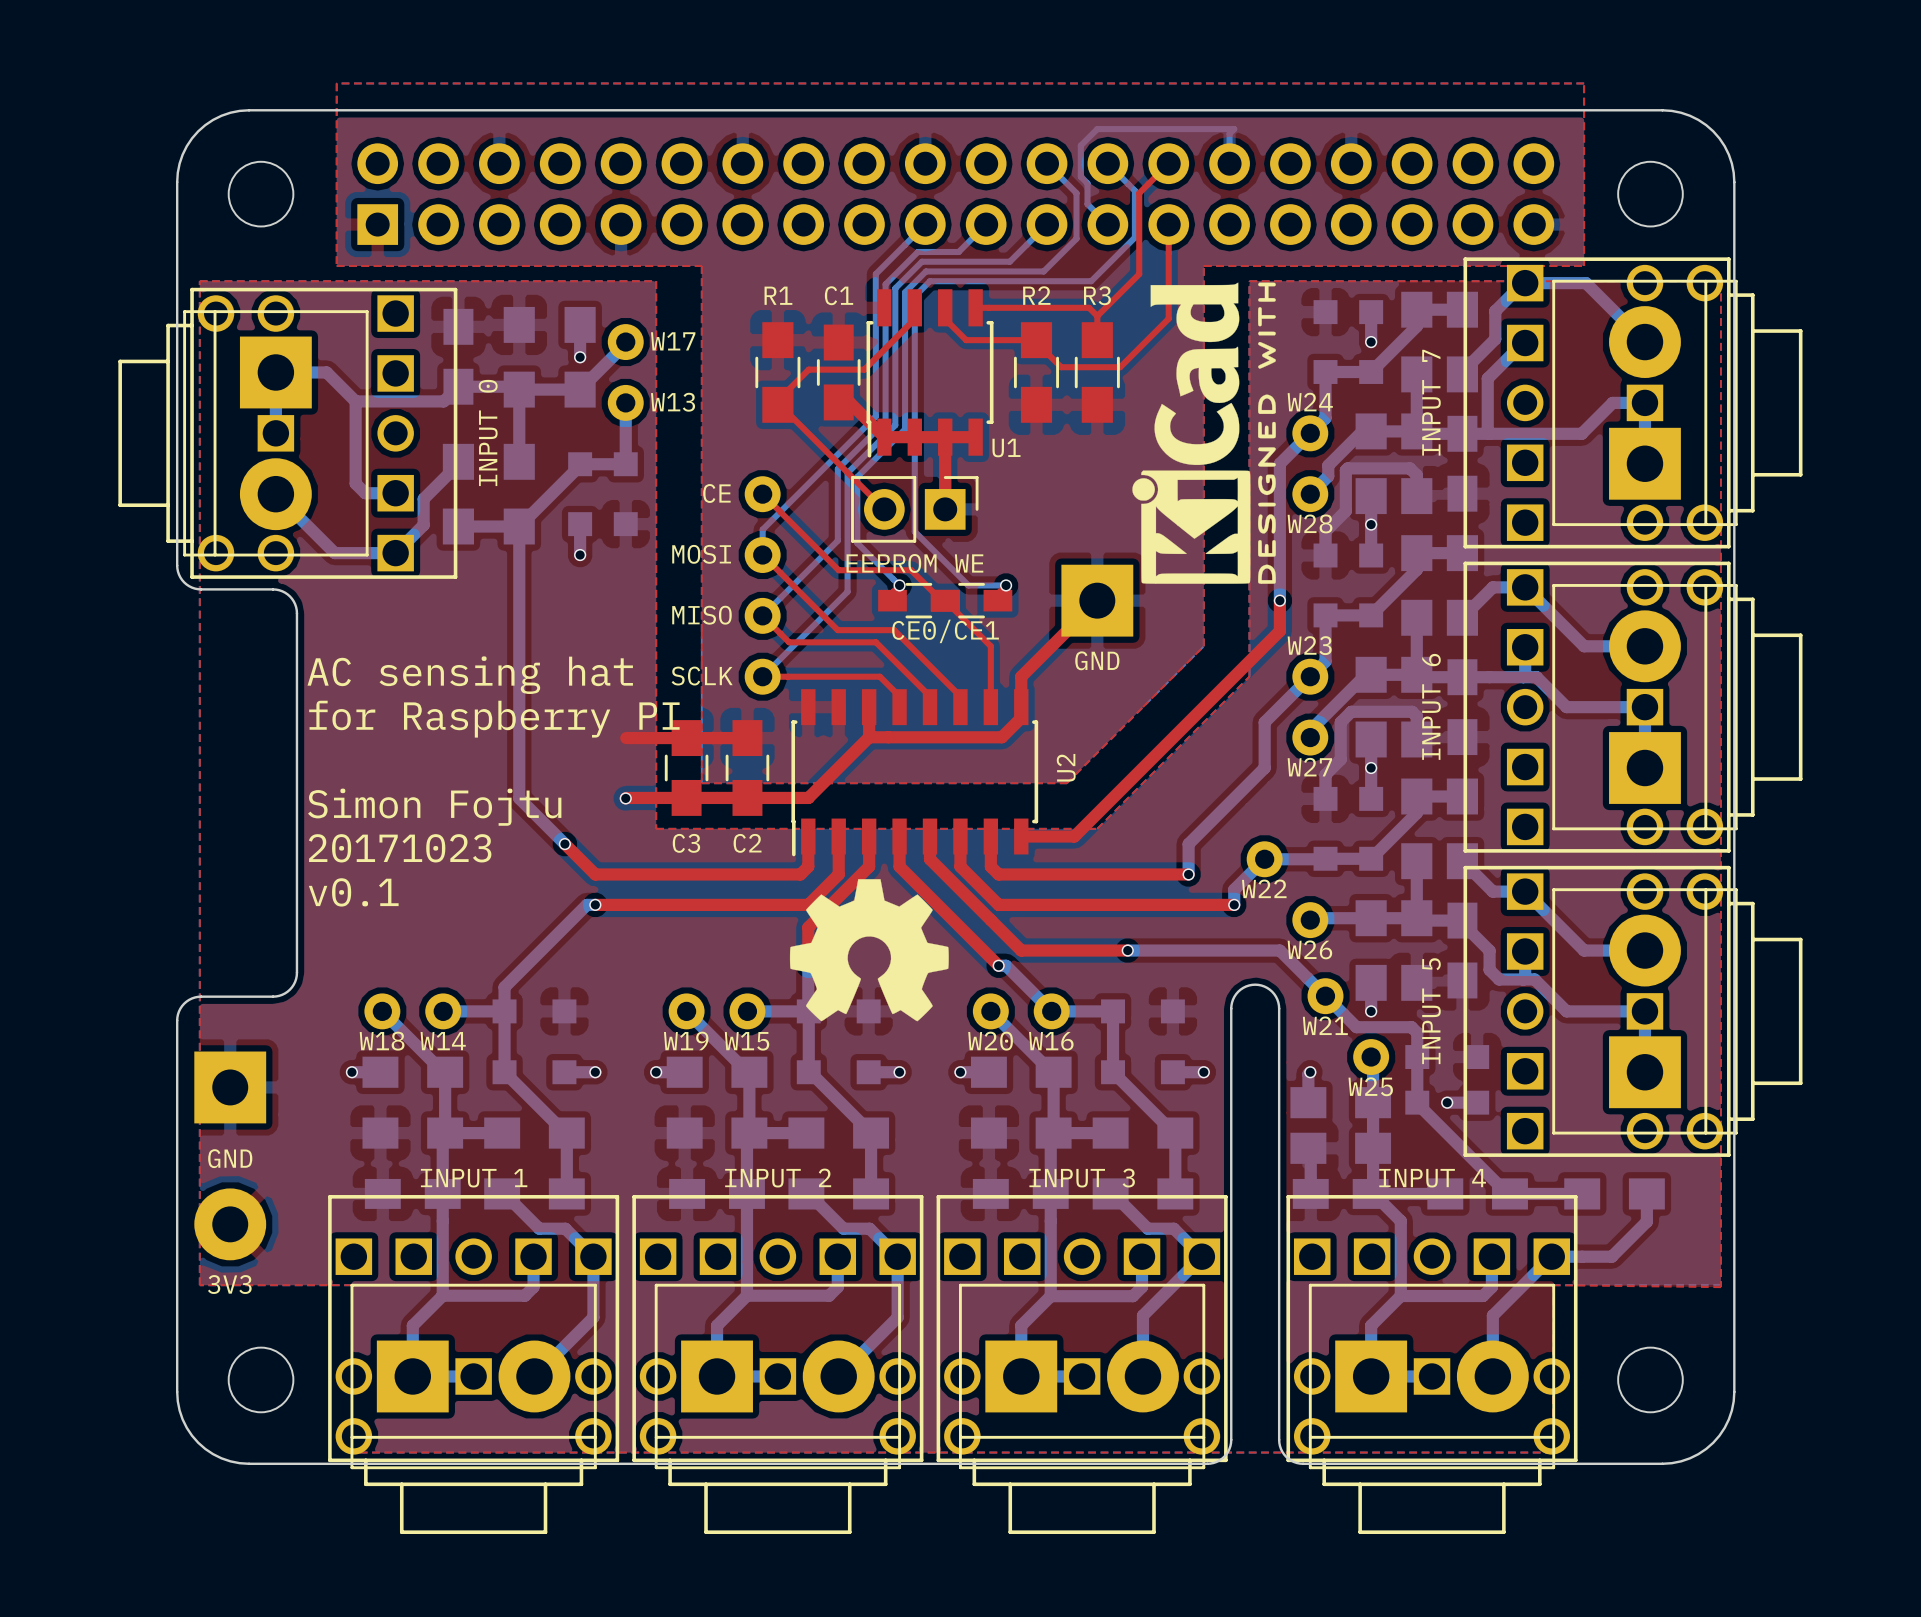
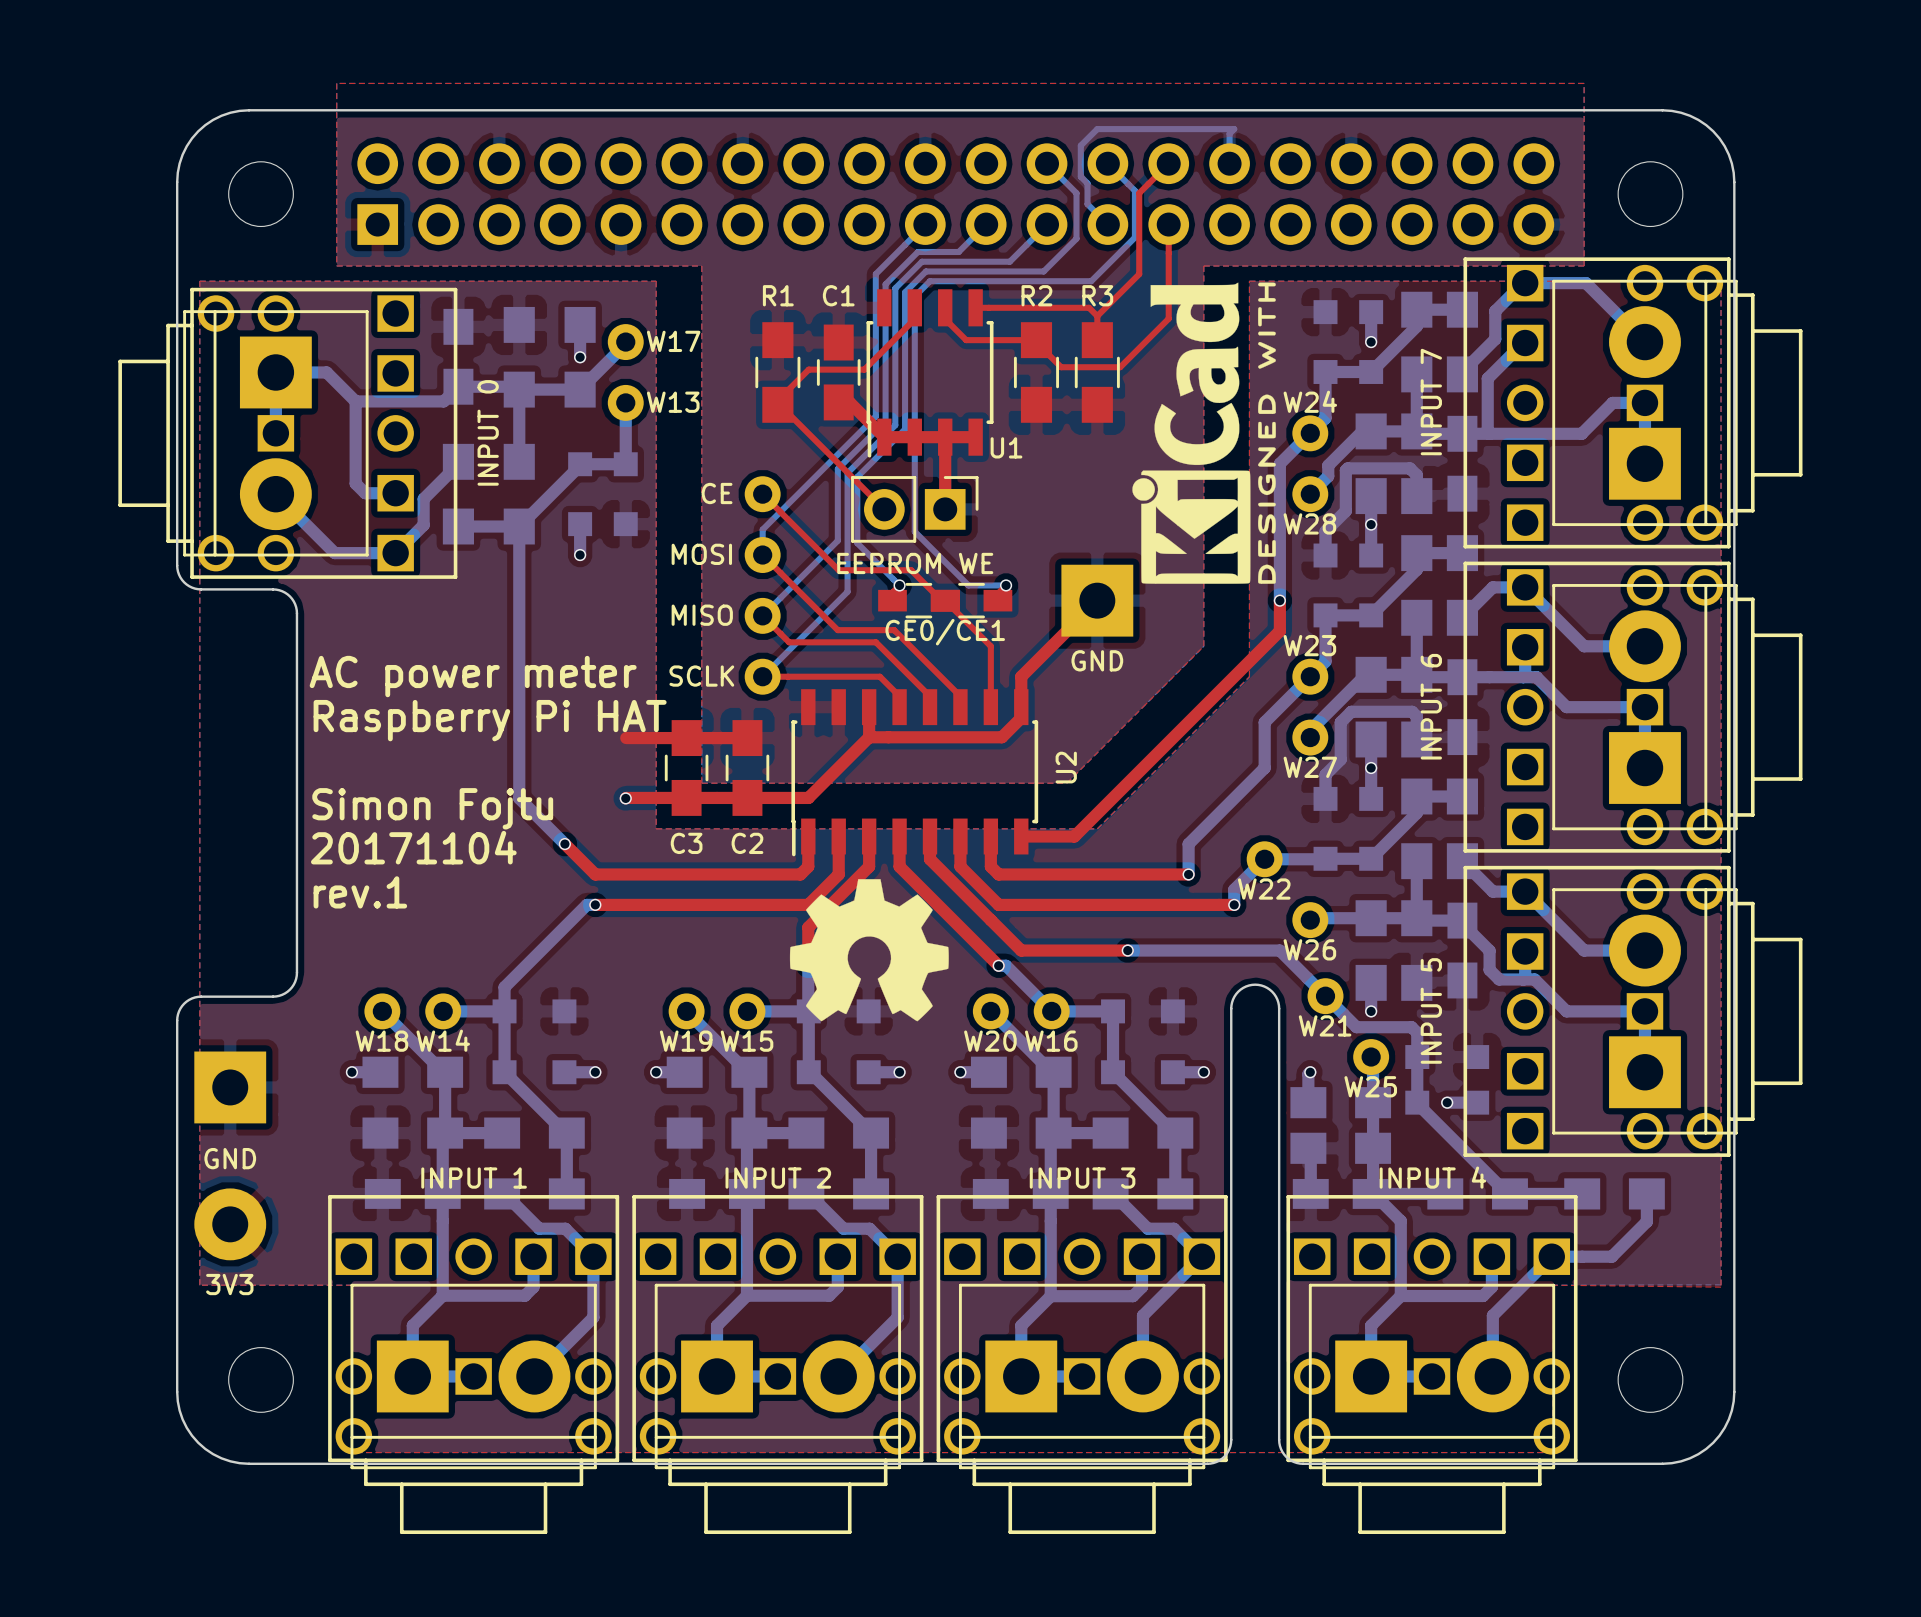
text: AC sensing hat (470, 675) -> AC power meter (473, 676)
text: for Raspberry PI (494, 719) -> Raspberry Pi HAT (490, 720)
text: 20171023 (400, 848) -> 20171104 (413, 847)
text: v0.1 (353, 892) -> rev.1 (360, 892)

